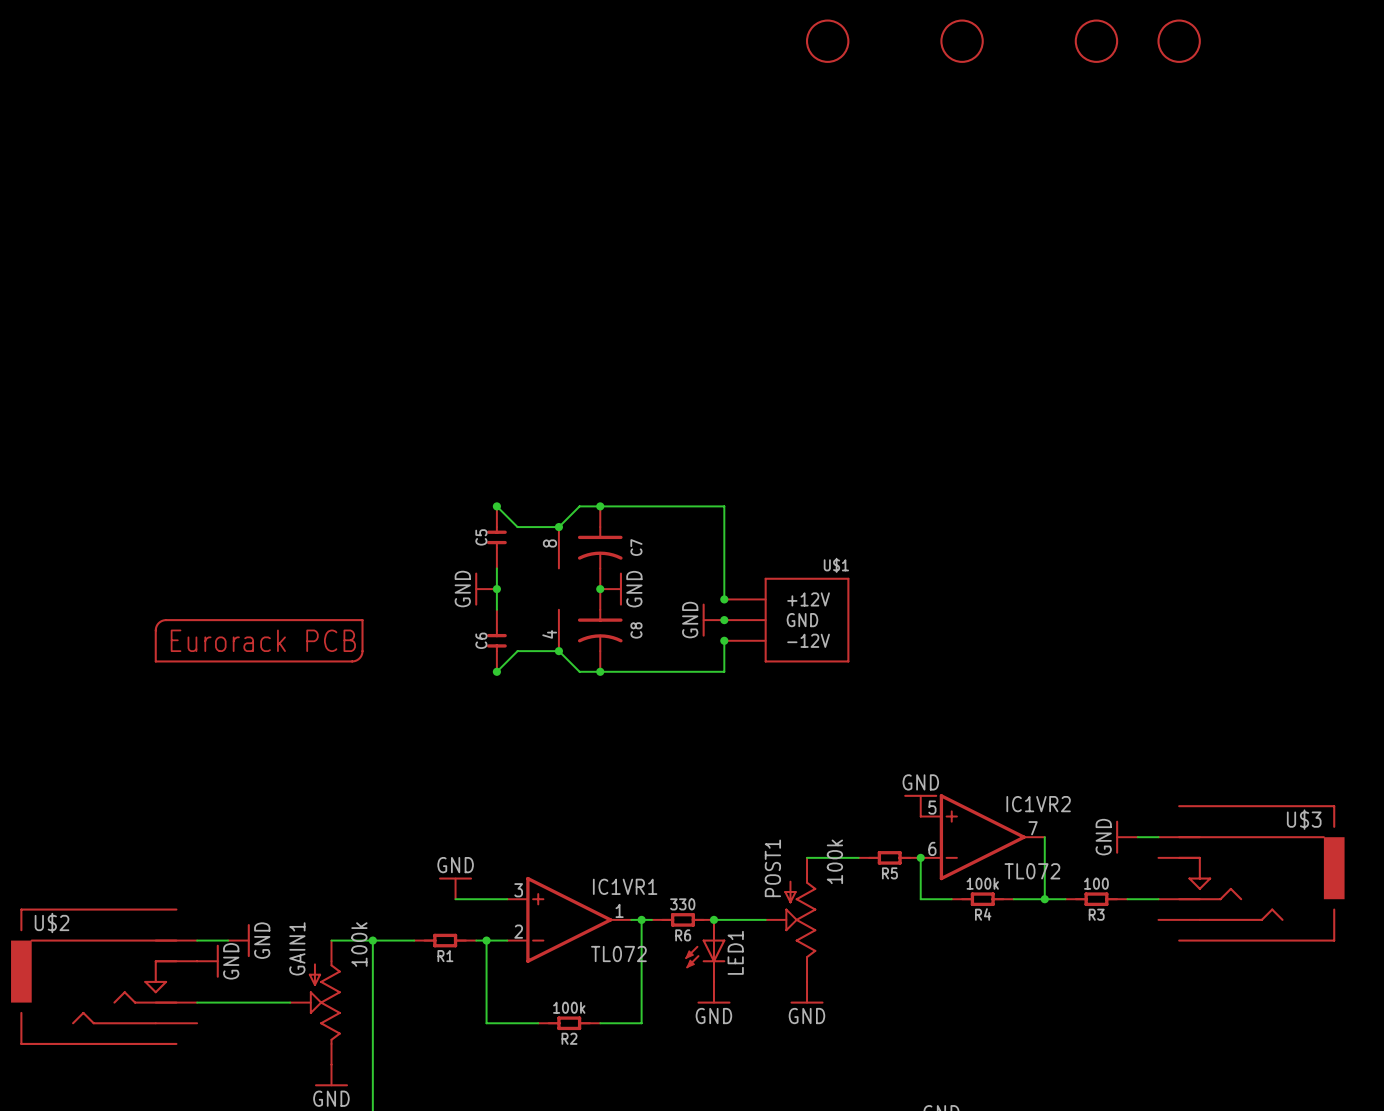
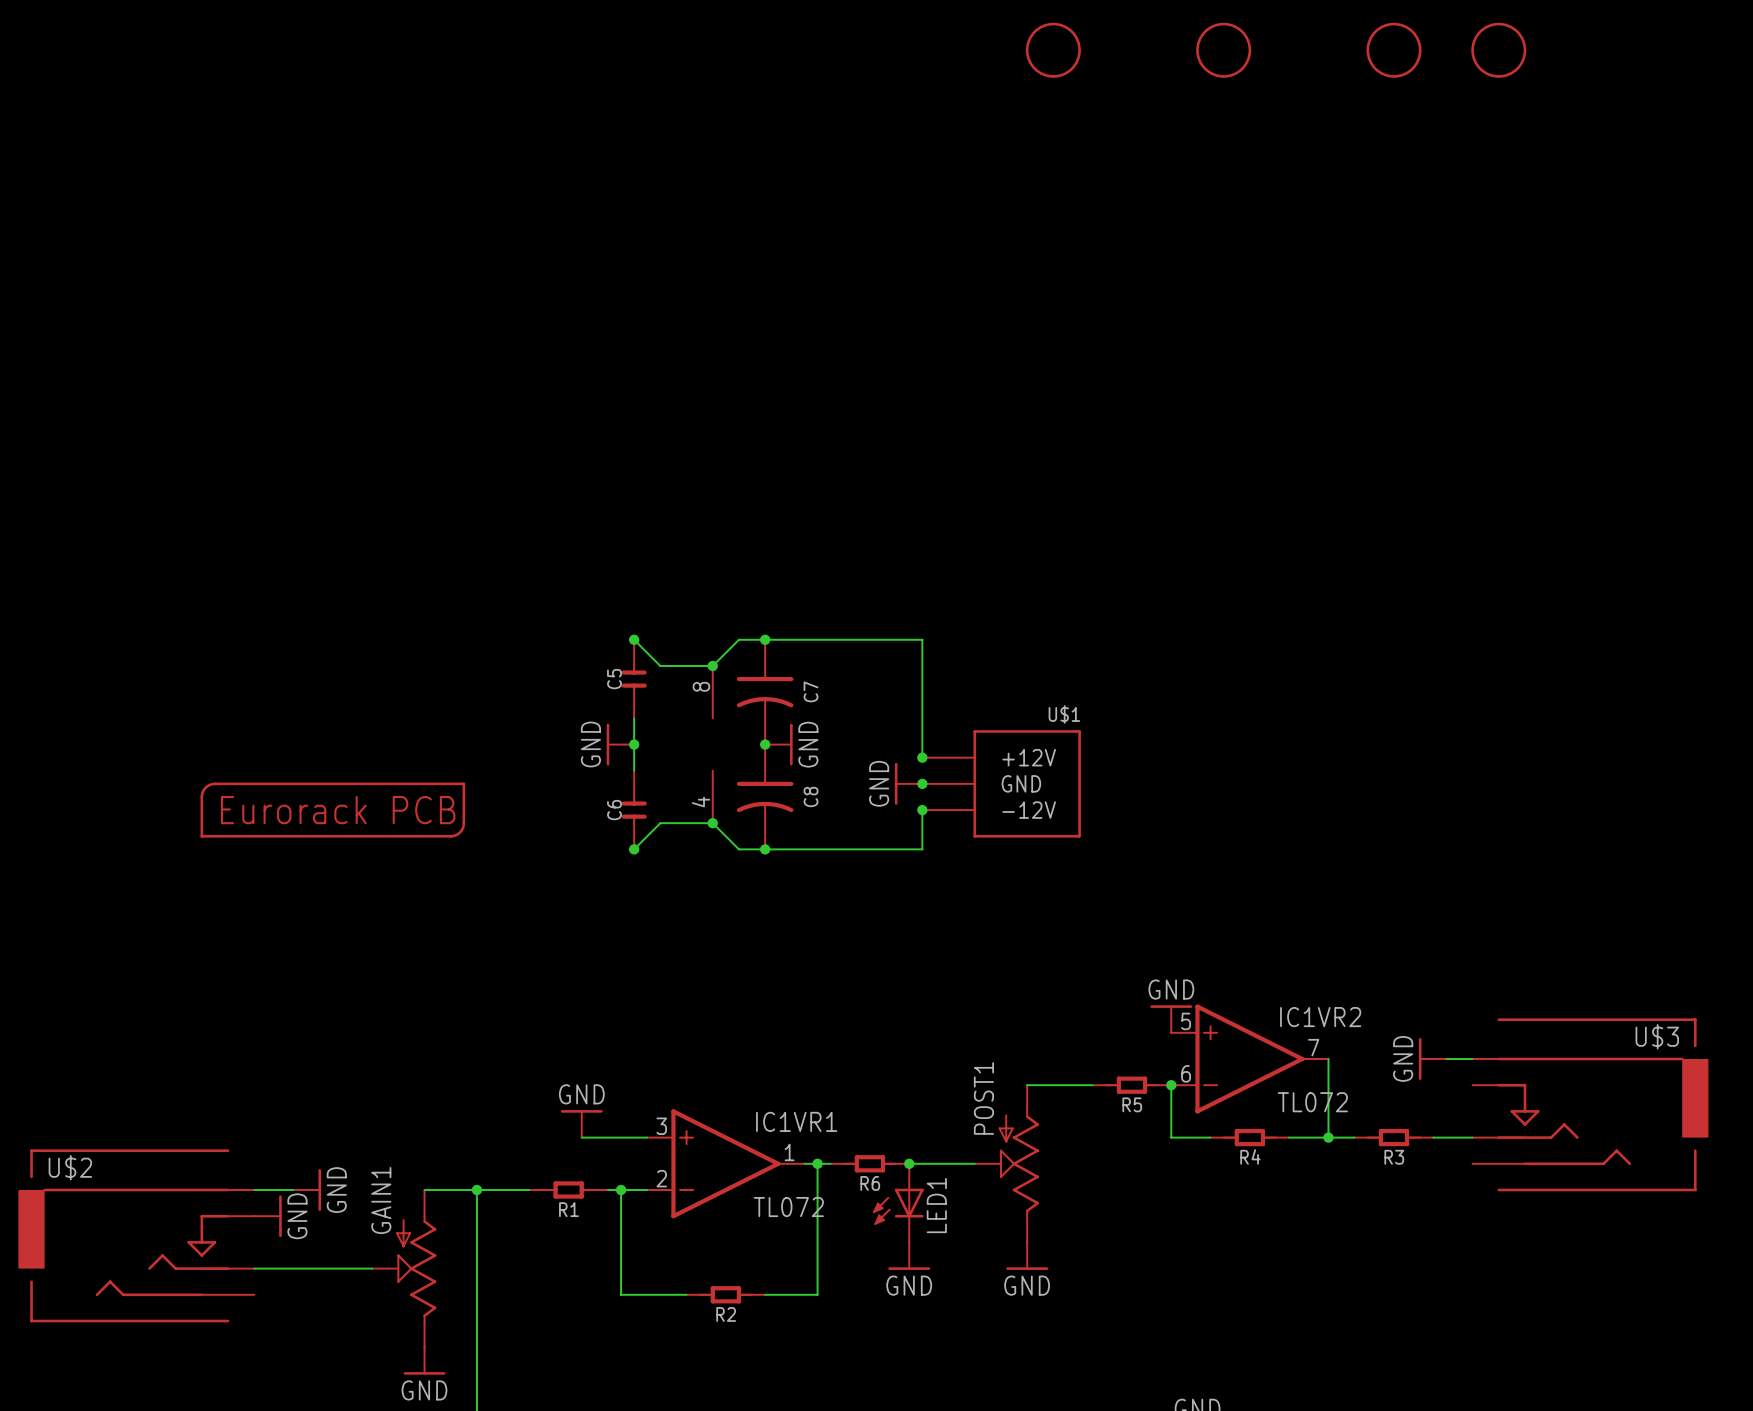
POST1 value: 100k (834, 861) -> none
R4 value: 100k (982, 883) -> none
R3 value: 100 (1096, 883) -> none
R6 value: 330 (682, 904) -> none
GAIN1 value: 100k (359, 944) -> none
R2 value: 100k (569, 1007) -> none

